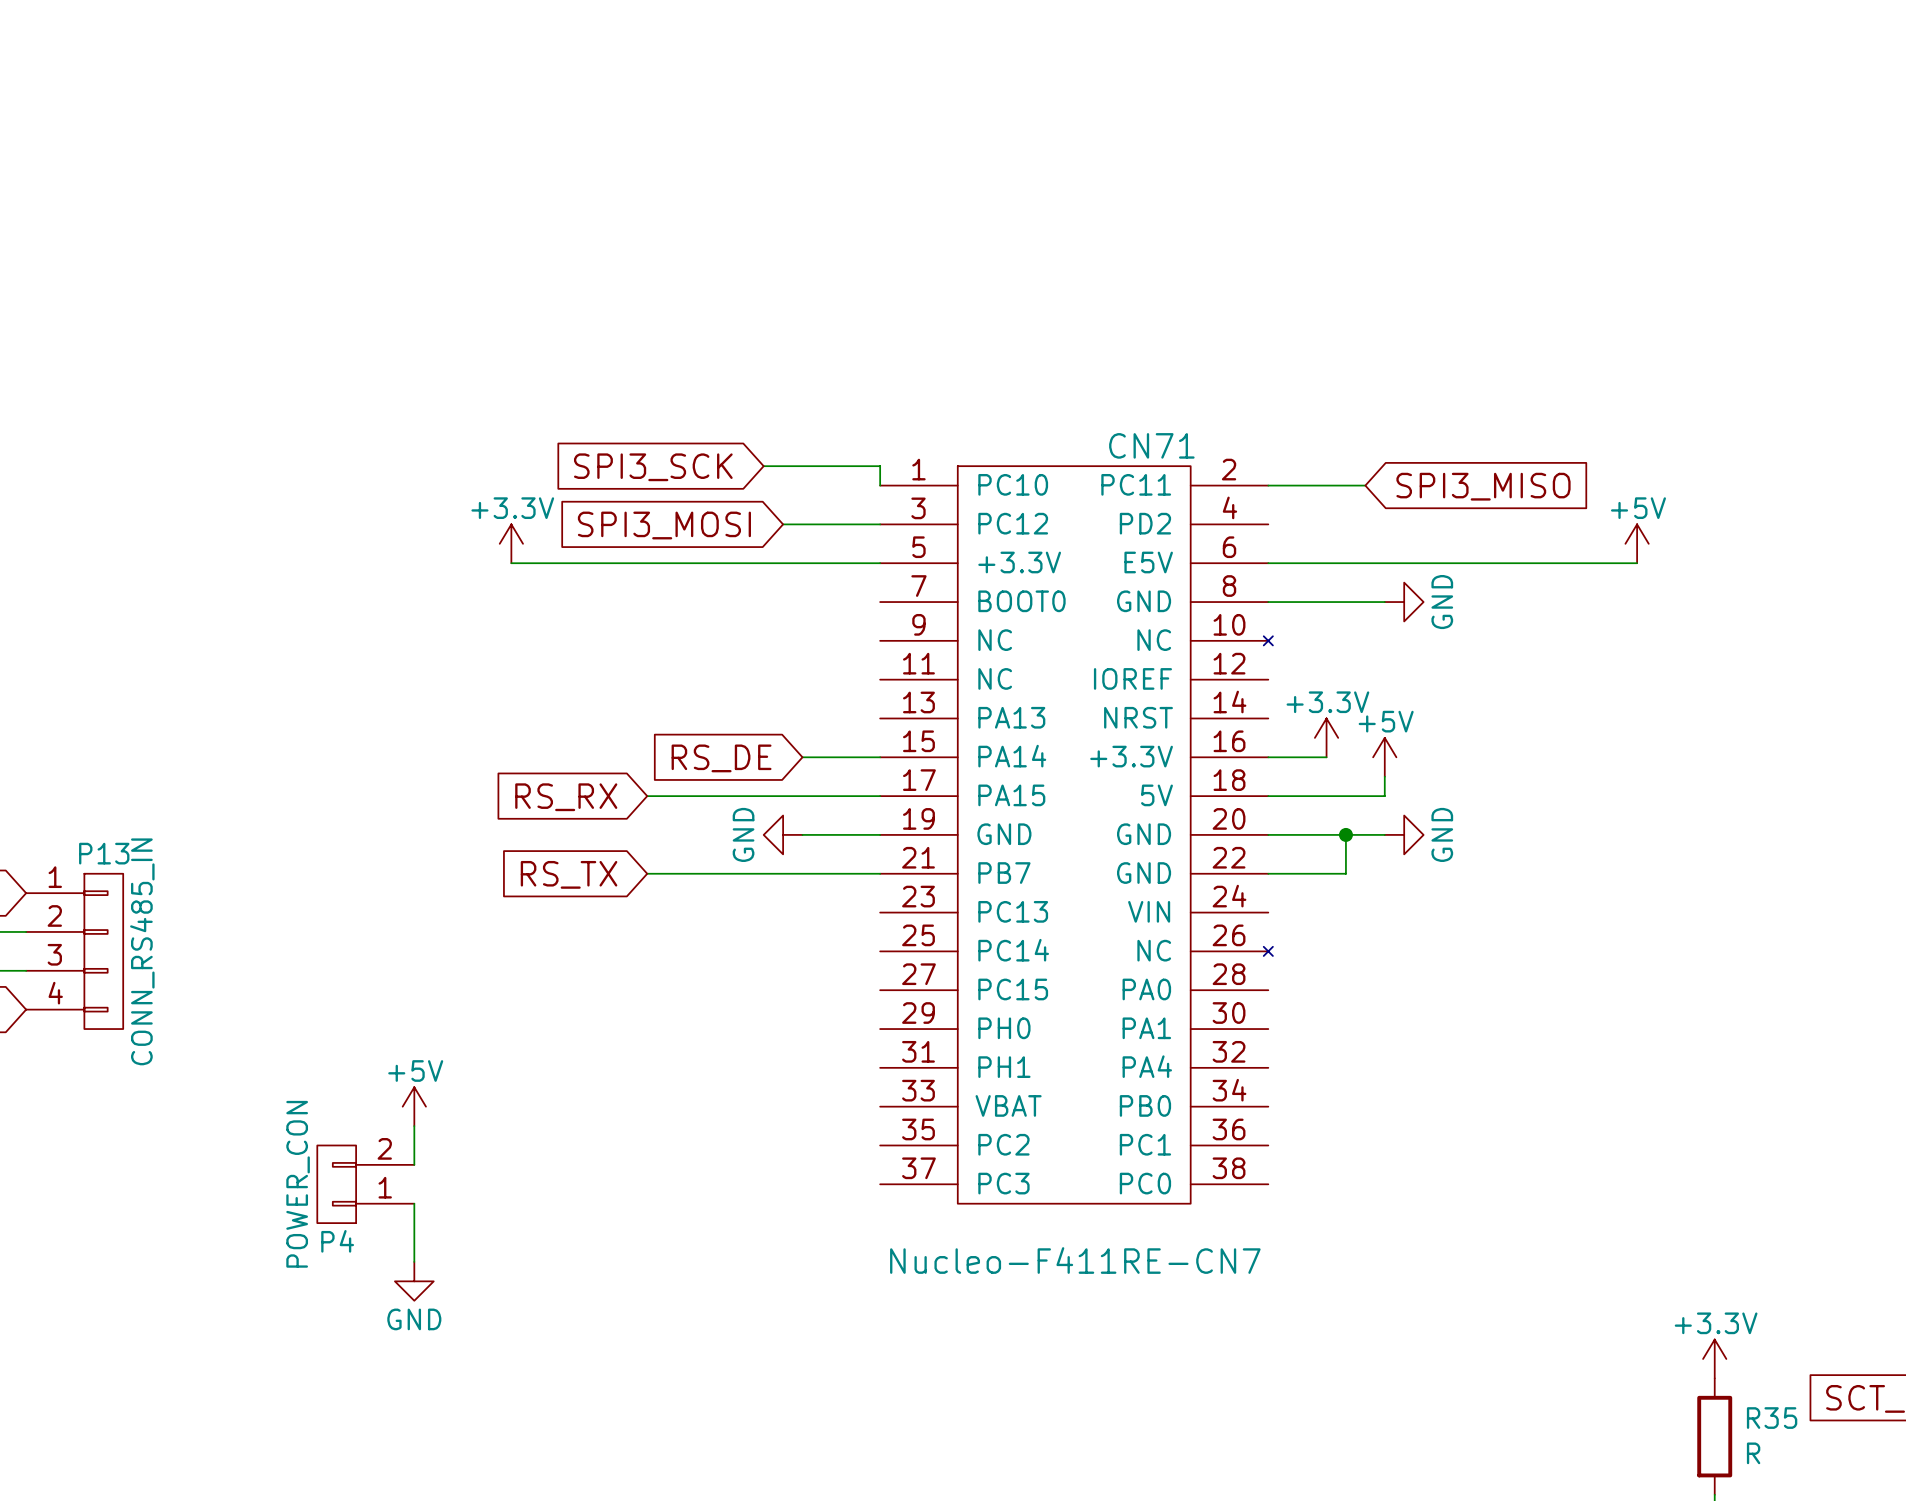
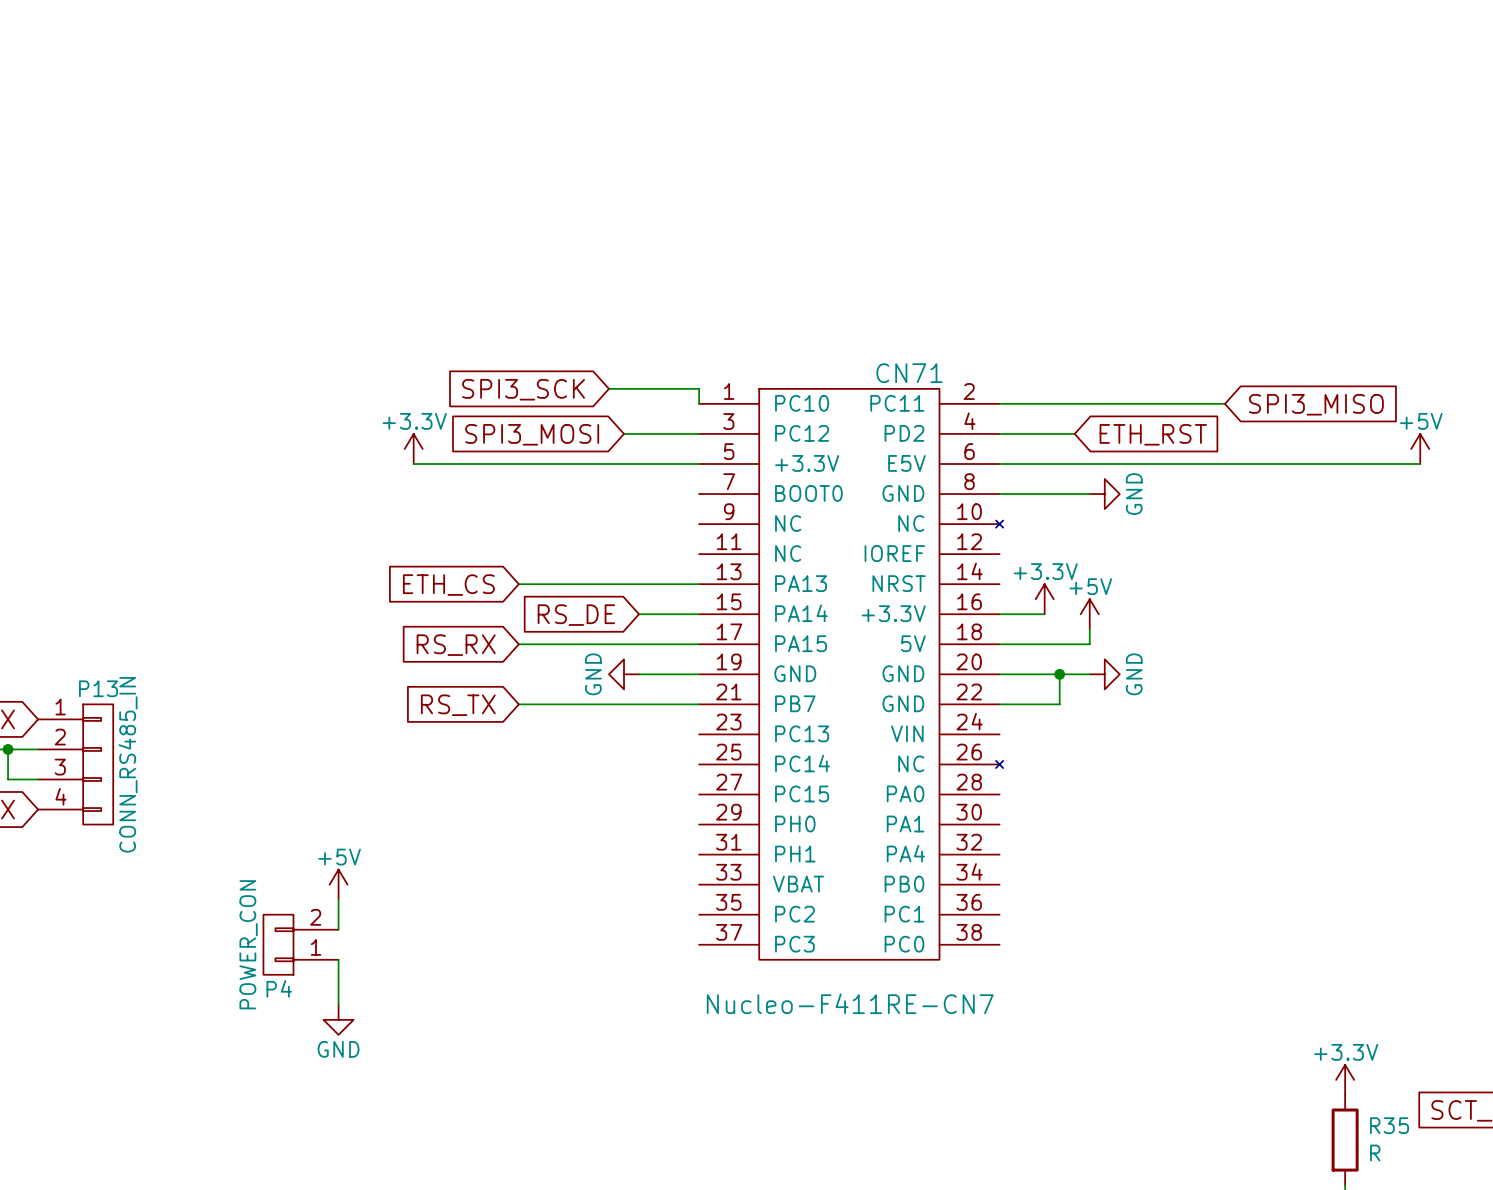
wire: none -> (1074, 403) (1224, 403)
global label position: SPI3_MISO (1483, 486) -> SPI3_MISO (1316, 404)
wire: none -> (999, 433) (1074, 433)
global label: none -> ETH_RST (1153, 434)
power symbol position: +5V (1637, 543) -> +5V (1420, 448)
wire: none -> (1285, 463) (1420, 463)
wire: none -> (518, 584) (699, 584)
global label: none -> ETH_CS (448, 585)

